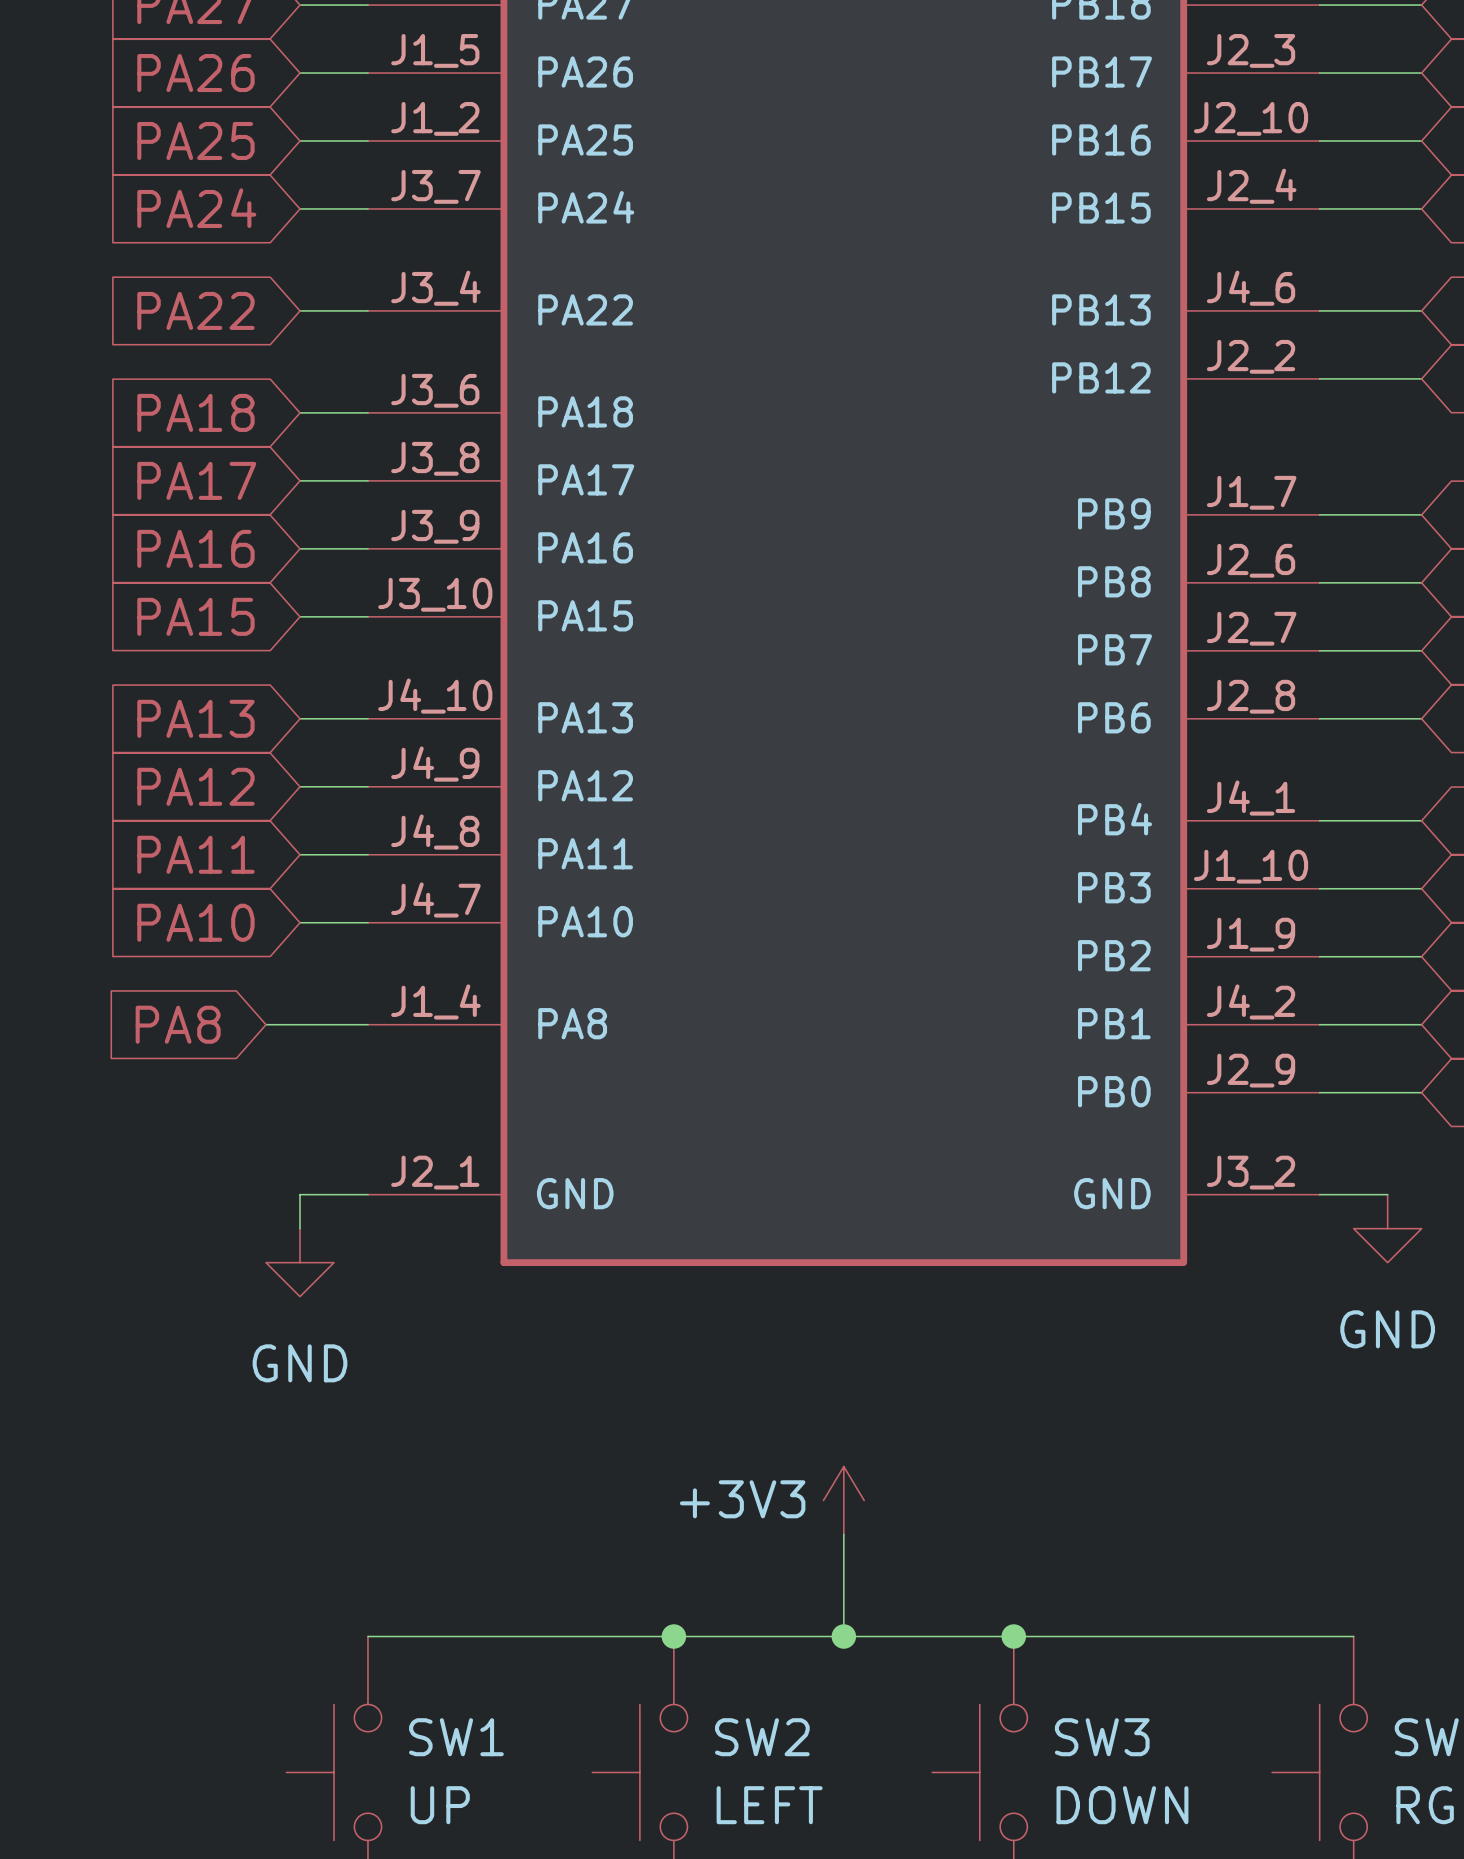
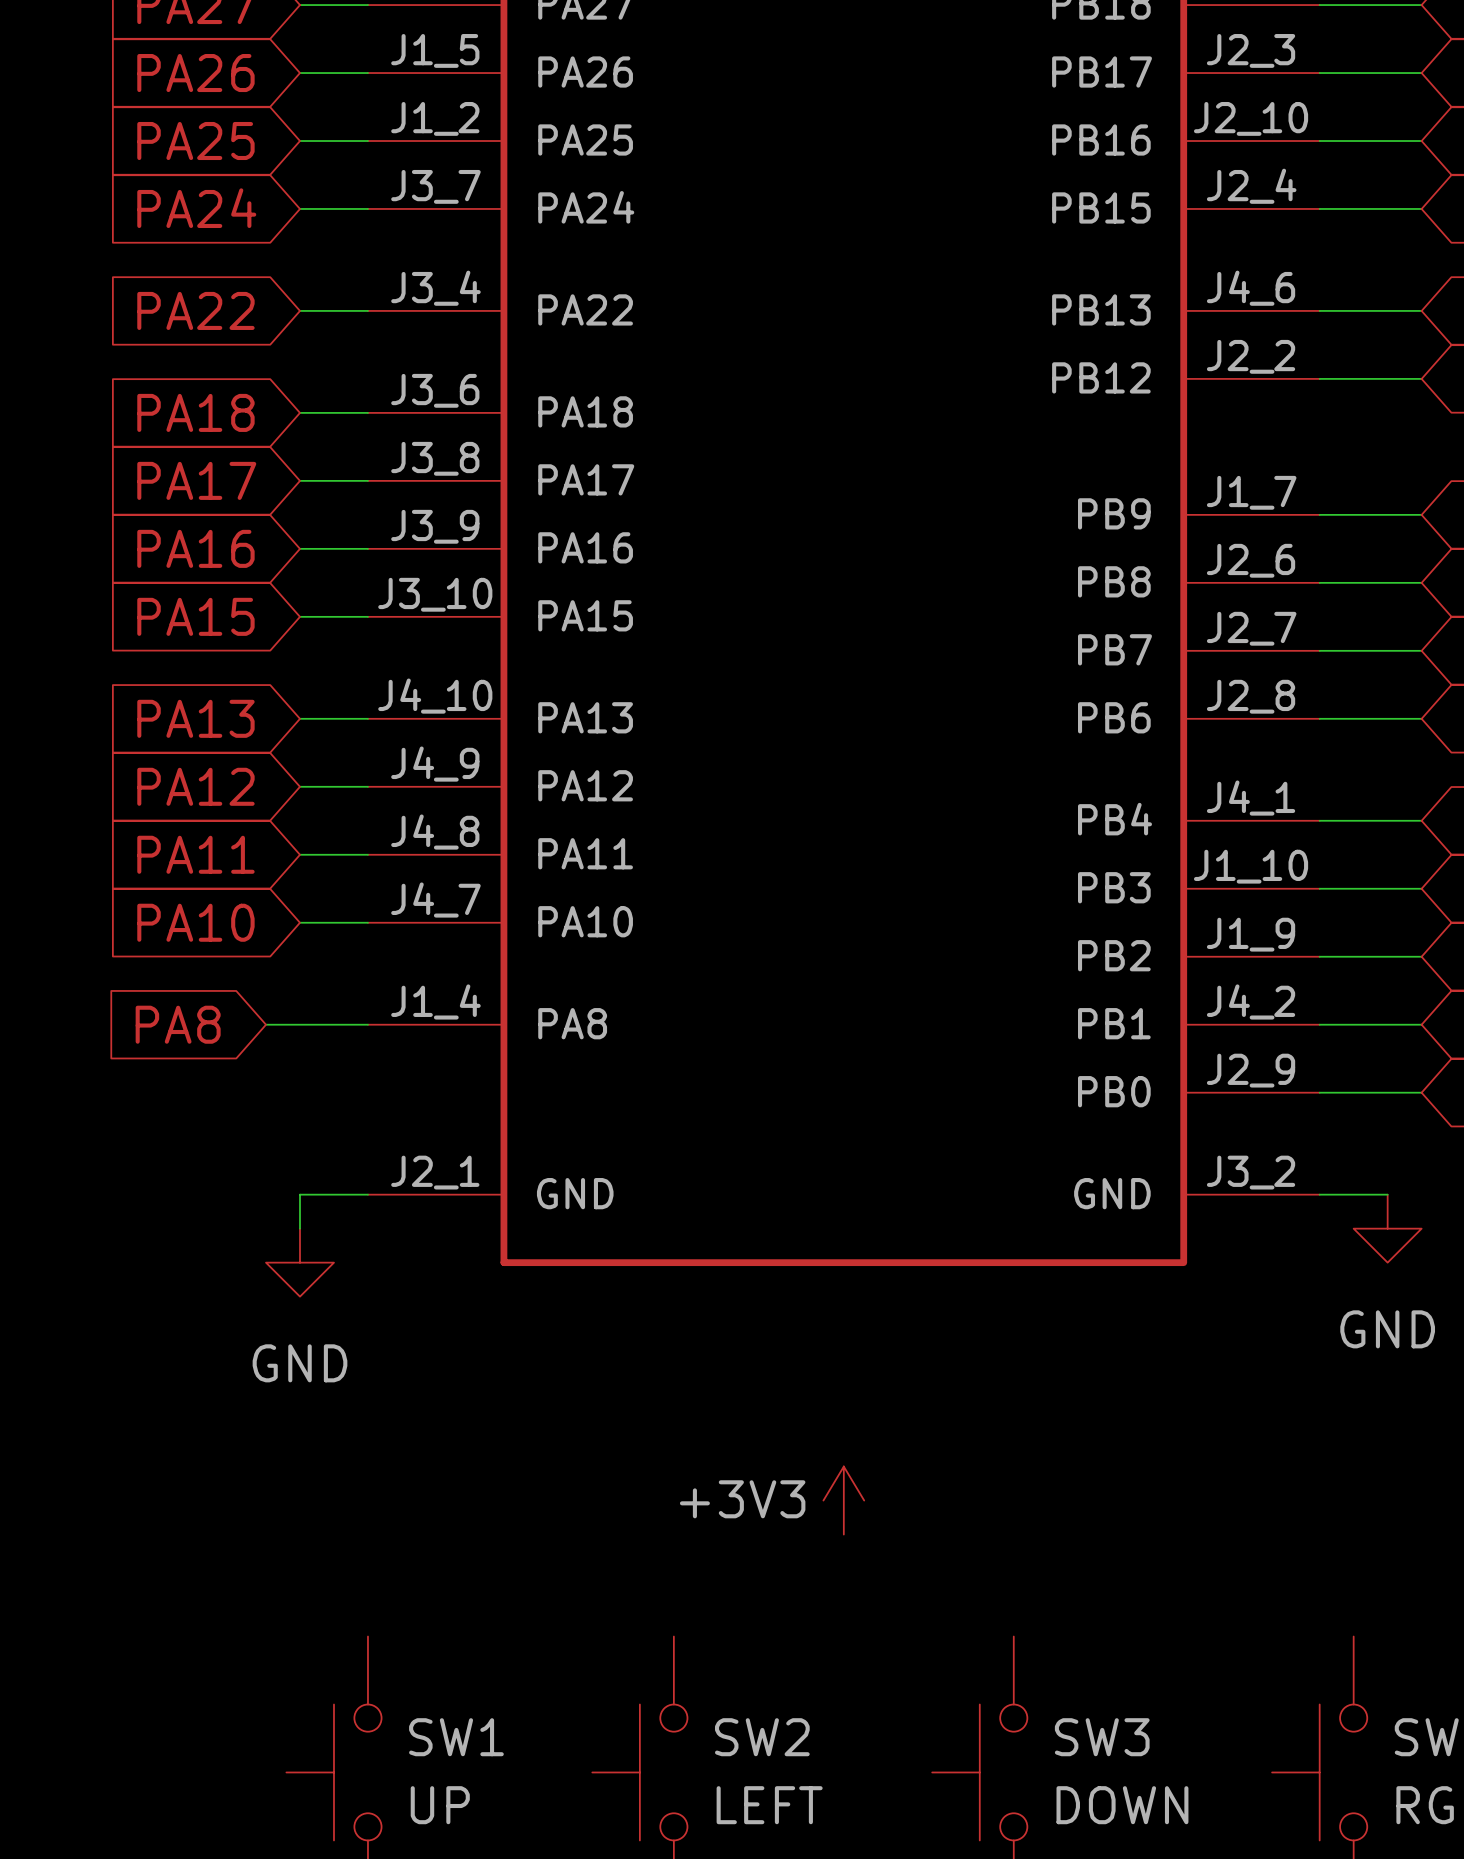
wire: (843, 1534) (843, 1636) -> none
wire: (367, 1636) (1353, 1636) -> none
junction: (673, 1636) -> none
junction: (843, 1636) -> none
junction: (1013, 1636) -> none

